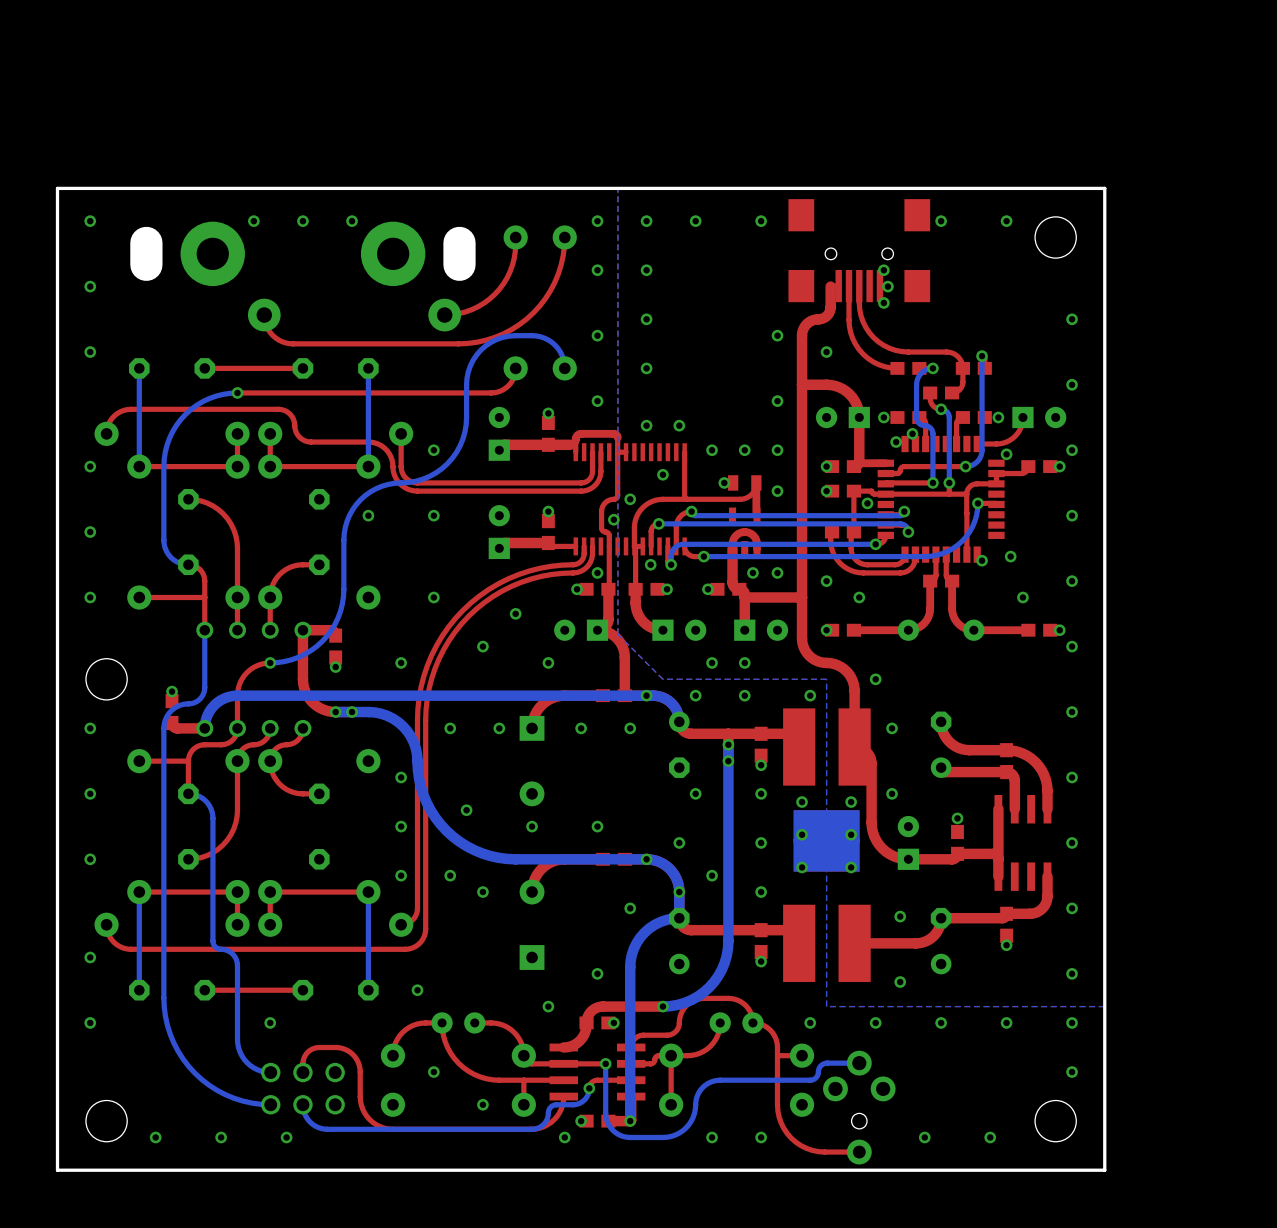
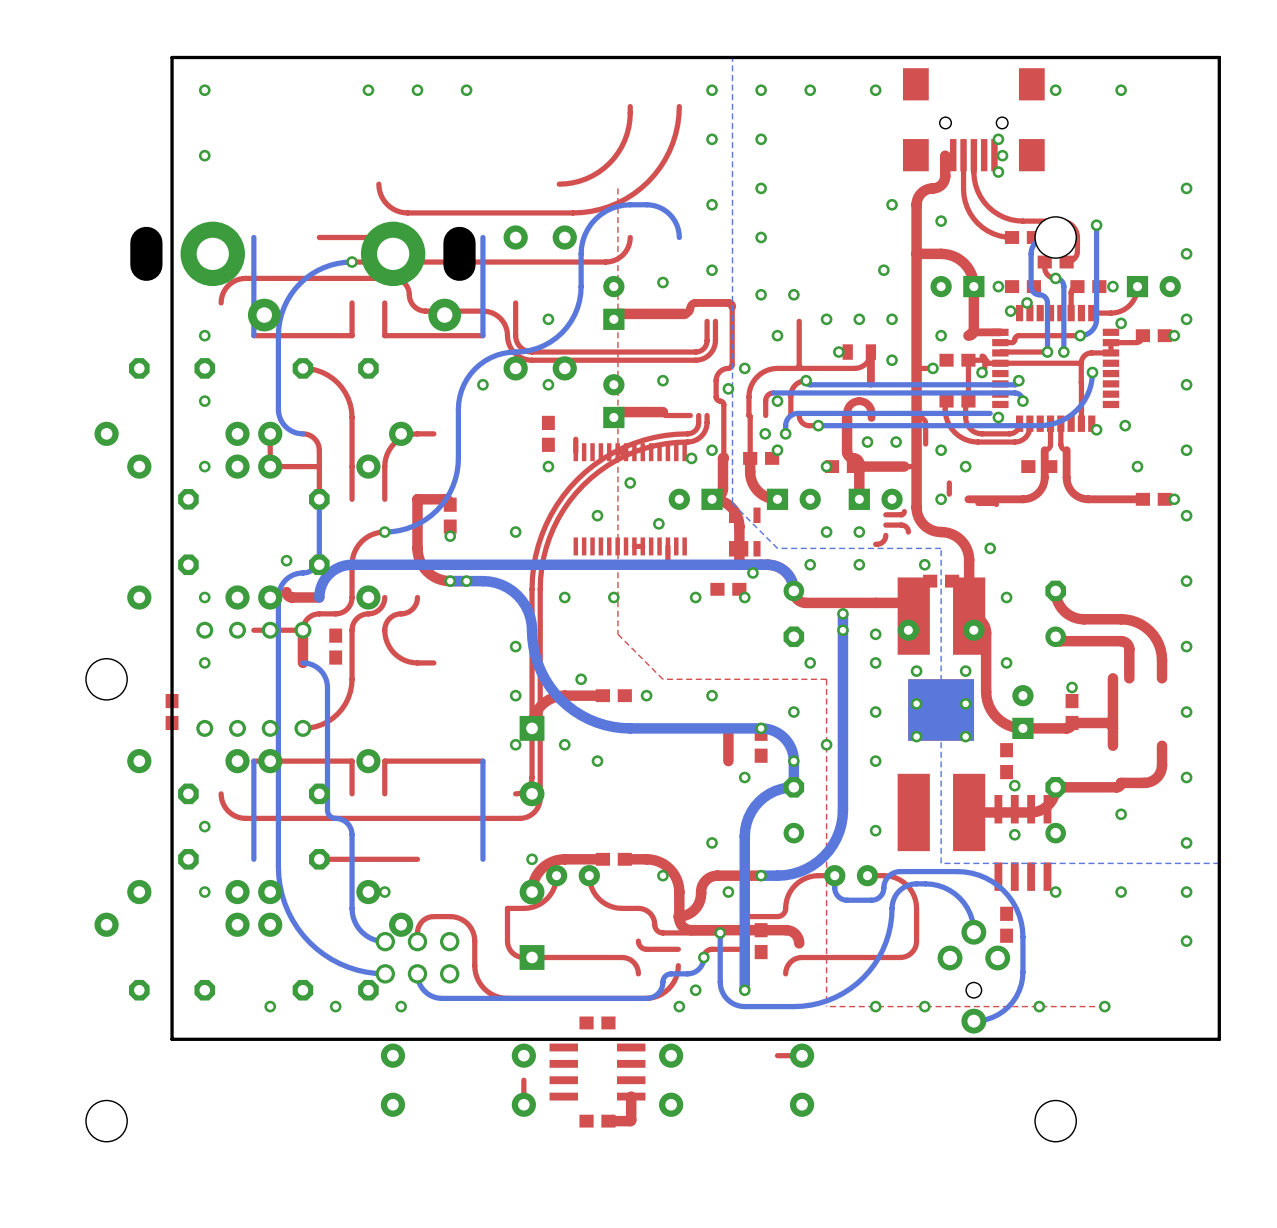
bottom zone outline: none -> (732, 57) (732, 503) (777, 548) (941, 548) (941, 863) (1219, 863)
via: none -> (204, 90)
via: none -> (368, 90)
via: none -> (417, 90)
via: none -> (466, 90)
via: none -> (712, 90)
via: none -> (761, 90)
via: none -> (810, 90)
via: none -> (875, 90)
via: none -> (1055, 90)
via: none -> (1121, 90)
via: none -> (712, 139)
via: none -> (761, 139)
via: none -> (998, 139)
via: none -> (204, 155)
via: none -> (1002, 155)
via: none -> (998, 172)
bottom zone outline: (617, 188) (617, 634) (662, 679) (826, 679) (826, 1006) (1104, 1006) -> none
via: none -> (761, 188)
board edge: (1104, 188) (57, 188) (57, 1170) (1104, 1170) (1104, 188) -> (1219, 57) (172, 57) (172, 1039) (1219, 1039) (1219, 57)
via: none -> (1186, 188)
via: none -> (892, 204)
via: (90, 221) -> none
via: (253, 221) -> none
via: (302, 221) -> none
via: (352, 221) -> none
via: (597, 221) -> none
via: (646, 221) -> none
via position: (695, 221) -> (712, 204)
via: (761, 221) -> none
via: (1006, 221) -> none
via: none -> (1096, 225)
top track: none -> (417, 237) (319, 237)
top track: (515, 237) (514, 257) (510, 271) (494, 294) (471, 309) (444, 315) -> (630, 106) (628, 127) (624, 140) (609, 163) (586, 178) (559, 184)
top track: (564, 237) (563, 255) (558, 273) (545, 298) (533, 312) (519, 324) (503, 333) (485, 340) (458, 343) (289, 343) (272, 335) (266, 326) (264, 315) -> (679, 106) (675, 134) (669, 151) (660, 167) (648, 181) (633, 193) (617, 202) (600, 209) (572, 212) (403, 212) (387, 204) (381, 195) (378, 184)
via: none -> (761, 237)
part: none -> (1022, 237)
part position: (859, 250) -> (973, 119)
via: none -> (1186, 253)
via: none -> (352, 262)
part: none -> (1055, 262)
via: (597, 270) -> none
via: (646, 270) -> none
via: none -> (712, 270)
via: none -> (1055, 278)
via: none -> (662, 282)
via: (90, 286) -> none
top track: (838, 286) (830, 286) (830, 308) (828, 314) (823, 318) (808, 322) (802, 333) (802, 644) (811, 657) (820, 662) (840, 666) (852, 680) (854, 690) (854, 747) (864, 750) (871, 759) (871, 827) (876, 840) (882, 848) (889, 854) (903, 858) (952, 859) (955, 857) (957, 853) (992, 853) (996, 855) (998, 859) -> (953, 155) (945, 155) (945, 177) (942, 183) (937, 187) (922, 191) (916, 202) (917, 513) (926, 526) (934, 531) (955, 535) (967, 549) (969, 560) (969, 616) (979, 619) (985, 628) (986, 696) (988, 705) (996, 717) (1004, 723) (1018, 728) (1066, 728) (1070, 726) (1072, 722) (1107, 722) (1111, 724) (1112, 728)
top track: (849, 286) (849, 326) (855, 344) (863, 354) (873, 361) (884, 366) (897, 368) -> (963, 155) (963, 195) (970, 213) (977, 223) (987, 231) (999, 235) (1011, 237)
top track: (859, 286) (859, 309) (863, 321) (869, 332) (878, 341) (895, 350) (948, 352) (959, 358) (962, 366) (962, 384) (958, 390) (952, 392) -> (973, 155) (974, 178) (977, 190) (984, 201) (993, 210) (1010, 219) (1063, 221) (1074, 227) (1077, 235) (1077, 254) (1073, 259) (1066, 262)
via: (887, 286) -> none
part: none -> (957, 286)
via: none -> (998, 286)
part: none -> (1022, 286)
part: none -> (1088, 286)
via: none -> (1112, 286)
part: none -> (1153, 286)
via: none -> (761, 294)
via: none -> (793, 294)
top track: none -> (384, 302) (384, 335) (482, 335)
part: none -> (613, 302)
via: (883, 302) -> none
via: none -> (1027, 302)
via: none -> (1010, 311)
via: none -> (548, 319)
via: (646, 319) -> none
via: none -> (826, 319)
via: none -> (859, 319)
via: none -> (892, 319)
via: (1072, 319) -> none
via: none -> (1186, 319)
via: none -> (1121, 323)
via: none -> (204, 335)
via: (597, 335) -> none
via: none -> (941, 335)
top track: none -> (1080, 335) (1018, 335) (1012, 342) (1000, 342)
via: none -> (1080, 335)
part: none -> (1153, 335)
via: none -> (1174, 335)
via: (90, 352) -> none
via position: (826, 352) -> (838, 352)
via: none -> (1047, 352)
via: none -> (1063, 352)
bottom track: (982, 356) (981, 452) (975, 463) (965, 466) -> (1096, 225) (1096, 321) (1090, 332) (1080, 335)
via position: (982, 356) -> (982, 372)
via: none -> (892, 360)
part: none -> (957, 360)
bottom track: (139, 368) (139, 466) -> (253, 237) (253, 335)
top track: (302, 368) (204, 368) -> (302, 368) (315, 370) (332, 378) (341, 387) (348, 398) (352, 417) (352, 499)
bottom track: (368, 368) (368, 466) -> (482, 237) (482, 335)
top track: (515, 368) (510, 383) (503, 389) (494, 392) (237, 392) -> (630, 237) (625, 252) (617, 258) (608, 261) (352, 262)
bottom track: (564, 368) (563, 359) (558, 348) (551, 342) (540, 336) (502, 337) (491, 342) (480, 350) (473, 360) (468, 372) (466, 424) (462, 439) (456, 452) (447, 463) (429, 476) (415, 481) (382, 486) (370, 491) (356, 504) (345, 527) (343, 596) (335, 624) (322, 641) (304, 654) (284, 661) (270, 662) -> (679, 237) (676, 224) (672, 217) (666, 211) (655, 205) (617, 206) (605, 211) (595, 219) (587, 229) (582, 241) (580, 293) (577, 308) (571, 321) (556, 337) (544, 345) (530, 350) (496, 355) (479, 364) (470, 373) (459, 396) (458, 465) (449, 493) (441, 505) (425, 519) (406, 528) (384, 532)
via position: (646, 368) -> (662, 380)
via: none -> (744, 368)
part: (908, 368) -> none
bottom track: (932, 368) (921, 373) (916, 384) (916, 419) (920, 424) (929, 427) (932, 432) (932, 482) -> (1047, 237) (1035, 242) (1031, 253) (1031, 288) (1035, 293) (1044, 296) (1047, 301) (1047, 352)
part: (973, 368) -> none
via: none -> (1092, 372)
via: none -> (806, 380)
via: none -> (1018, 380)
via: none -> (482, 384)
via: none -> (548, 384)
top track: (802, 384) (835, 385) (849, 394) (856, 404) (859, 417) (859, 461) (859, 462) (858, 463) (858, 463) (857, 465) (853, 466) (856, 463) (857, 463) (885, 463) -> (916, 253) (949, 254) (964, 263) (971, 274) (973, 286) (973, 330) (973, 331) (973, 332) (973, 332) (971, 334) (968, 335) (971, 332) (971, 332) (1000, 332)
via: (1072, 384) -> none
via: none -> (1186, 384)
via: none -> (728, 388)
bottom track: (237, 392) (209, 398) (190, 409) (176, 425) (167, 445) (163, 466) (164, 543) (167, 552) (173, 559) (188, 564) -> (352, 262) (330, 265) (311, 274) (295, 288) (281, 314) (278, 335) (278, 412) (285, 426) (293, 431) (302, 433)
via: (237, 392) -> none
top track: (930, 392) (932, 405) (941, 409) -> (1044, 262) (1046, 274) (1055, 278)
part: (941, 392) -> none
via: none -> (204, 401)
via: (597, 401) -> none
part: none -> (613, 401)
part: none -> (957, 401)
via: none -> (1022, 401)
bottom track: (941, 409) (946, 411) (949, 416) (949, 482) -> (1055, 278) (1060, 280) (1063, 285) (1063, 352)
via: (941, 409) -> none
via: (548, 413) -> none
part: (842, 417) -> none
via: (883, 417) -> none
part: (908, 417) -> none
top track: (962, 417) (956, 422) (956, 444) -> (1077, 286) (1071, 291) (1071, 313)
part: (973, 417) -> none
top track: (1022, 417) (1019, 430) (1009, 440) (999, 443) (977, 444) -> (1137, 286) (1133, 299) (1124, 309) (1114, 312) (1091, 313)
part: (1039, 417) -> none
via: (646, 425) -> none
via: (679, 425) -> none
via: none -> (818, 425)
via: none -> (1125, 425)
via: none -> (1096, 429)
top track: (106, 433) (111, 418) (118, 412) (127, 409) (280, 409) (291, 415) (296, 433) (304, 440) (368, 442) (380, 445) (391, 457) (393, 472) (398, 481) (405, 487) (417, 491) (586, 490) (595, 485) (599, 478) (600, 452) -> (221, 302) (223, 293) (228, 285) (242, 278) (395, 278) (405, 284) (411, 302) (419, 309) (482, 311) (495, 314) (505, 326) (508, 342) (512, 350) (522, 358) (532, 360) (700, 359) (707, 356) (713, 348) (715, 321)
top track: (237, 433) (237, 466) (139, 466) -> (352, 302) (352, 335) (253, 335)
top track: (401, 433) (401, 470) (407, 479) (415, 482) (582, 482) (588, 480) (592, 474) (592, 452) -> (515, 302) (516, 339) (520, 347) (529, 351) (697, 351) (702, 349) (706, 343) (707, 321)
part: (499, 433) -> none
via: none -> (765, 433)
via: none -> (785, 433)
via: (912, 433) -> none
via: none -> (867, 442)
via: (433, 450) -> none
top track: (499, 450) (504, 444) (571, 444) (580, 433) (616, 434) (617, 496) (615, 498) (605, 502) (601, 511) (601, 529) (609, 535) (608, 620) (604, 627) (597, 630) (611, 633) (622, 647) (624, 657) (624, 695) (656, 695) (666, 699) (675, 708) (680, 727) (688, 733) (787, 733) (795, 737) (799, 747) -> (613, 319) (618, 313) (686, 313) (694, 302) (731, 304) (732, 365) (730, 367) (719, 372) (716, 380) (716, 398) (723, 404) (722, 489) (719, 496) (712, 499) (725, 502) (737, 516) (739, 526) (739, 564) (771, 564) (780, 568) (790, 577) (795, 596) (802, 602) (902, 603) (911, 608) (913, 616)
via: (744, 450) -> none
via: none -> (941, 450)
via: (1072, 450) -> none
via: none -> (1186, 450)
top track: (684, 452) (684, 496) (687, 499) -> (799, 321) (799, 365) (802, 368)
via: (1006, 454) -> none
via: none -> (691, 458)
part: none -> (761, 458)
via: (90, 466) -> none
via: none -> (204, 466)
top track: (368, 466) (319, 466) -> none
via: none -> (548, 466)
top track: (904, 466) (898, 473) (885, 473) -> (904, 466) (859, 466)
top track: (965, 466) (916, 466) -> none
top track: (1028, 466) (1023, 473) (996, 473) (996, 483) (973, 484) (968, 487) (966, 494) -> (1142, 335) (1137, 342) (1110, 342) (1110, 352) (1087, 353) (1083, 356) (1081, 363)
via: (1059, 466) -> none
via: none -> (1137, 466)
via: (662, 474) -> none
via: (724, 482) -> none
part position: (744, 482) -> (859, 352)
top track: (932, 482) (885, 483) -> (1047, 352) (1000, 352)
via: (932, 482) -> none
via: (949, 482) -> none
via: (777, 491) -> none
via: (826, 491) -> none
part: (842, 491) -> none
top track: (966, 494) (874, 494) (871, 491) (853, 491) (853, 532) (851, 534) (851, 548) (854, 558) (865, 564) (896, 564) (902, 561) (905, 554) -> (1081, 363) (989, 363) (986, 360) (968, 360) (968, 401) (965, 403) (965, 417) (969, 427) (979, 433) (1010, 433) (1016, 430) (1019, 423)
top track: (966, 494) (966, 554) -> (1081, 363) (1081, 423)
top track: (188, 499) (201, 500) (212, 505) (227, 518) (233, 529) (237, 548) (237, 630) -> none
via position: (630, 499) -> (630, 482)
part: none -> (695, 499)
part: none -> (793, 499)
part: none -> (875, 499)
part position: (941, 499) -> (1055, 368)
via: none -> (941, 499)
part: none -> (1153, 499)
via: none -> (1174, 499)
via: (867, 503) -> none
bottom track: (977, 503) (974, 520) (966, 536) (953, 548) (936, 555) (703, 556) -> (1092, 372) (1089, 390) (1080, 405) (1067, 417) (1051, 424) (818, 425)
via: (977, 503) -> none
top track: none -> (450, 504) (445, 499) (417, 499) (418, 556) (424, 568) (433, 576) (445, 580) (466, 581)
via: (548, 511) -> none
top track: (691, 511) (683, 513) (677, 521) (676, 546) -> (806, 380) (796, 383) (791, 390) (790, 415)
via: (691, 511) -> none
bottom track: (904, 511) (900, 515) (695, 515) (691, 511) -> (1018, 380) (1014, 384) (810, 384) (806, 380)
via: (904, 511) -> none
via position: (368, 515) -> (384, 532)
via: (433, 515) -> none
part: none -> (450, 515)
top track: (757, 515) (756, 482) (752, 492) (744, 498) (659, 499) (648, 503) (640, 510) (634, 527) (635, 606) (643, 622) (652, 628) (662, 630) -> (871, 384) (870, 352) (867, 362) (858, 367) (773, 368) (763, 372) (754, 379) (748, 396) (750, 475) (753, 485) (760, 493) (777, 499)
via: (1072, 515) -> none
via: none -> (1186, 515)
via position: (613, 519) -> (597, 515)
top track: (658, 523) (651, 528) (651, 546) -> (773, 392) (766, 397) (765, 415)
bottom track: (658, 523) (900, 523) (906, 526) (908, 532) -> (773, 392) (1014, 392) (1020, 395) (1022, 401)
via: (90, 532) -> none
top track: none -> (384, 532) (368, 536) (356, 548) (352, 560) (351, 599) (345, 610) (337, 613) (313, 615) (306, 620) (302, 630) (253, 630)
part: (499, 532) -> none
via: none -> (515, 532)
part: (548, 532) -> none
via: none -> (826, 532)
top track: (831, 532) (830, 544) (835, 556) (843, 566) (854, 571) (904, 572) (913, 565) (915, 554) -> (946, 401) (945, 413) (949, 425) (958, 435) (969, 440) (1018, 441) (1027, 434) (1029, 423)
part: (842, 532) -> none
via: none -> (859, 532)
via: (908, 532) -> none
via: none -> (450, 536)
bottom track: (875, 544) (681, 544) (672, 550) (671, 564) -> (990, 413) (796, 413) (787, 419) (785, 433)
via: (875, 544) -> none
top track: (575, 546) (551, 546) (548, 542) (504, 542) (500, 544) (499, 548) -> (690, 415) (665, 415) (662, 412) (619, 412) (615, 413) (613, 417)
top track: (584, 546) (583, 557) (577, 563) (529, 571) (508, 578) (479, 595) (455, 618) (442, 636) (431, 655) (423, 676) (417, 709) (417, 910) (411, 921) (401, 924) -> (698, 415) (697, 426) (691, 433) (643, 440) (612, 452) (594, 464) (577, 479) (563, 496) (546, 524) (535, 556) (532, 578) (531, 779) (527, 789) (515, 793)
top track: (592, 546) (591, 560) (582, 570) (531, 578) (502, 590) (484, 602) (461, 623) (438, 659) (429, 688) (426, 709) (425, 928) (424, 936) (417, 945) (405, 949) (131, 949) (121, 947) (113, 942) (108, 934) (106, 924) -> (707, 415) (705, 429) (697, 439) (646, 448) (616, 460) (599, 471) (576, 492) (553, 528) (546, 547) (540, 578) (540, 797) (538, 805) (532, 814) (519, 818) (245, 818) (236, 816) (228, 811) (223, 803) (221, 793)
top track: (684, 546) (689, 555) (703, 556) -> (799, 415) (804, 424) (818, 425)
top track: (757, 548) (756, 539) (749, 532) (740, 532) (733, 539) (732, 583) (735, 587) (742, 590) (744, 593) (744, 630) -> (871, 417) (870, 408) (863, 402) (854, 402) (848, 408) (847, 452) (849, 456) (856, 459) (859, 462) (859, 499)
via: none -> (990, 548)
top track: (935, 554) (935, 576) (930, 581) (929, 611) (923, 623) (911, 630) (853, 630) -> (1050, 423) (1050, 445) (1044, 450) (1044, 480) (1038, 492) (1025, 499) (968, 499)
top track: (946, 554) (946, 576) (952, 581) (952, 611) (958, 623) (971, 630) (1028, 630) -> (1060, 423) (1061, 445) (1066, 450) (1066, 480) (1073, 492) (1085, 499) (1142, 499)
via: (703, 556) -> none
via: (1010, 556) -> none
via: none -> (286, 560)
via: (982, 560) -> none
top track: (188, 564) (198, 568) (204, 576) (204, 630) -> (302, 433) (312, 437) (318, 445) (319, 499)
top track: (319, 564) (294, 565) (283, 571) (276, 577) (270, 593) (270, 630) -> (433, 433) (409, 434) (397, 440) (391, 446) (385, 462) (384, 499)
via: (650, 564) -> none
via: (671, 564) -> none
via: none -> (810, 564)
via: none -> (859, 564)
via: none -> (924, 564)
via: (597, 572) -> none
via: (777, 572) -> none
via: none -> (450, 581)
via: none -> (466, 581)
via: (826, 581) -> none
via: (1072, 581) -> none
via: none -> (1186, 581)
via position: (577, 589) -> (564, 597)
part: (597, 589) -> none
part: (646, 589) -> none
via: (667, 589) -> none
via position: (707, 589) -> (695, 597)
via: (90, 597) -> none
top track: (204, 597) (139, 597) -> none
via: none -> (204, 597)
top track: none -> (417, 597) (415, 605) (411, 610) (394, 615) (388, 620) (384, 628) (385, 638) (391, 650) (401, 658) (413, 662) (433, 662)
via: (433, 597) -> none
via: none -> (613, 597)
via: none -> (744, 597)
top track: (802, 597) (744, 597) -> none
via: (859, 597) -> none
via position: (1022, 597) -> (1006, 597)
via: (515, 613) -> none
part: none -> (793, 613)
bottom track: none -> (842, 613) (842, 810) (839, 831) (828, 851) (812, 865) (792, 874) (761, 875)
via: none -> (842, 613)
part: none -> (1055, 613)
part: none -> (941, 616)
bottom track: (204, 630) (203, 693) (196, 701) (173, 708) (167, 716) (164, 725) (163, 997) (165, 1016) (170, 1034) (178, 1051) (188, 1066) (202, 1079) (217, 1090) (234, 1098) (252, 1103) (270, 1104) -> (319, 499) (318, 562) (311, 570) (288, 578) (281, 585) (278, 594) (278, 866) (280, 885) (284, 903) (292, 920) (303, 935) (316, 948) (331, 959) (348, 967) (366, 972) (385, 973)
top track: (302, 630) (330, 630) (335, 635) -> none
part: (581, 630) -> none
part: (679, 630) -> none
part: (761, 630) -> none
via: (826, 630) -> none
part: (842, 630) -> none
via: none -> (842, 630)
part: (1039, 630) -> none
via: (1059, 630) -> none
via: none -> (875, 634)
via: (482, 646) -> none
via: none -> (515, 646)
via: (1072, 646) -> none
via: none -> (1186, 646)
via: none -> (204, 662)
top track: (270, 662) (261, 664) (250, 669) (239, 683) (237, 695) (237, 730) (234, 738) (225, 744) (196, 746) (190, 752) (188, 761) -> none
via: (270, 662) -> none
top track: (302, 662) (304, 687) (312, 702) (327, 710) (352, 712) -> none
via: (401, 662) -> none
via: (548, 662) -> none
via: (712, 662) -> none
via: (744, 662) -> none
via: none -> (810, 662)
via: none -> (875, 662)
via: none -> (1006, 662)
via: (335, 667) -> none
via: none -> (916, 671)
via: none -> (965, 671)
via: none -> (581, 679)
via: (875, 679) -> none
via: none -> (1072, 687)
via: (172, 691) -> none
via: none -> (515, 695)
via: (695, 695) -> none
via: none -> (712, 695)
via: (744, 695) -> none
via: (810, 695) -> none
part: none -> (941, 695)
via: none -> (916, 703)
via: none -> (965, 703)
bottom track: (335, 712) (381, 713) (392, 718) (403, 726) (410, 736) (415, 748) (420, 786) (430, 810) (446, 830) (474, 850) (507, 858) (650, 859) (662, 863) (672, 872) (679, 887) (679, 918) (660, 921) (644, 932) (636, 942) (630, 960) (630, 1121) -> (450, 581) (495, 582) (507, 587) (517, 595) (525, 605) (530, 617) (535, 655) (545, 679) (560, 699) (588, 719) (621, 728) (765, 728) (777, 732) (787, 741) (793, 756) (793, 787) (775, 791) (763, 797) (751, 811) (745, 829) (744, 990)
via: (335, 712) -> none
via: (352, 712) -> none
via: none -> (793, 712)
via: none -> (875, 712)
part: none -> (1022, 712)
part: none -> (1072, 712)
via: (1072, 712) -> none
via: none -> (1186, 712)
bottom track: (679, 721) (677, 711) (671, 703) (663, 697) (653, 695) (237, 695) (224, 698) (214, 705) (207, 715) (204, 728) -> (793, 590) (791, 580) (786, 572) (777, 566) (767, 564) (352, 564) (339, 567) (328, 574) (321, 584) (319, 597)
top track: (941, 721) (946, 739) (958, 748) (969, 750) (1011, 750) (1031, 758) (1039, 766) (1046, 780) (1047, 809) -> (1055, 590) (1059, 605) (1073, 617) (1083, 619) (1126, 619) (1146, 627) (1156, 639) (1160, 649) (1162, 678)
top track: (172, 722) (176, 728) (204, 728) -> (286, 592) (291, 597) (319, 597)
part: none -> (941, 724)
via: (90, 728) -> none
top track: (270, 728) (268, 736) (263, 741) (245, 746) (238, 754) (237, 816) (230, 834) (223, 844) (212, 852) (201, 857) (188, 859) -> none
top track: (302, 728) (300, 736) (296, 741) (280, 746) (273, 751) (270, 758) (271, 769) (276, 781) (286, 789) (298, 793) (319, 793) -> (302, 728) (315, 726) (327, 721) (337, 714) (345, 703) (351, 685) (353, 623) (360, 616) (378, 610) (383, 603) (384, 597)
via: (450, 728) -> none
via: (499, 728) -> none
via: (581, 728) -> none
via: (630, 728) -> none
via: none -> (761, 728)
via: (892, 728) -> none
via: none -> (916, 736)
via: none -> (965, 736)
via: none -> (515, 744)
via: none -> (564, 744)
part: (679, 744) -> none
bottom track: (728, 744) (728, 941) (726, 955) (718, 975) (703, 992) (684, 1002) (662, 1006) -> none
via: (728, 744) -> none
via: none -> (826, 744)
part: (941, 744) -> none
part: (826, 747) -> none
top track: (188, 761) (188, 793) -> none
top track: (188, 761) (139, 761) -> none
via: none -> (597, 761)
via: (728, 761) -> none
via: none -> (793, 761)
via: none -> (875, 761)
via: (761, 765) -> none
top track: (941, 767) (944, 772) (1010, 773) (1014, 779) (1014, 809) -> (1055, 636) (1059, 641) (1125, 642) (1129, 648) (1129, 678)
via: (401, 777) -> none
via: none -> (744, 777)
via: (1072, 777) -> none
via: none -> (1186, 777)
via: none -> (1014, 785)
via: (90, 793) -> none
bottom track: (188, 793) (203, 798) (209, 806) (212, 815) (213, 942) (217, 948) (231, 952) (236, 961) (238, 1047) (244, 1059) (250, 1065) (262, 1071) (270, 1072) -> (302, 662) (312, 664) (320, 670) (327, 684) (327, 811) (331, 817) (345, 821) (351, 830) (353, 917) (356, 925) (365, 934) (376, 940) (385, 941)
via: (695, 793) -> none
via: (761, 793) -> none
via: (892, 793) -> none
via: (802, 802) -> none
via: (851, 802) -> none
top track: (998, 809) (998, 876) -> (1112, 678) (1112, 745)
via: (466, 810) -> none
part: none -> (793, 810)
part: none -> (1055, 810)
part: none -> (941, 812)
via: none -> (1121, 814)
via: (957, 818) -> none
via: none -> (204, 826)
via: (401, 826) -> none
via: (532, 826) -> none
via: (597, 826) -> none
part: (826, 826) -> none
via: none -> (875, 830)
via: (802, 834) -> none
via: (851, 834) -> none
via: none -> (1014, 834)
via: (679, 842) -> none
via: none -> (712, 842)
via: (761, 842) -> none
part: (908, 842) -> none
part: (957, 842) -> none
via: (1072, 842) -> none
via: none -> (1186, 842)
part: (826, 855) -> none
via: (90, 859) -> none
via: none -> (532, 859)
via: (646, 859) -> none
via: (802, 867) -> none
via: (851, 867) -> none
via position: (401, 875) -> (384, 892)
via: (450, 875) -> none
top track: none -> (556, 875) (552, 892) (540, 904) (528, 908) (507, 908) (507, 943) (510, 951) (517, 956) (523, 957) (624, 957) (635, 963) (638, 973)
part: none -> (572, 875)
top track: none -> (589, 875) (593, 892) (602, 901) (613, 907) (646, 910) (652, 916) (655, 927) (659, 932) (720, 932)
via: none -> (662, 875)
via: (712, 875) -> none
top track: none -> (761, 875) (717, 875) (709, 877) (702, 885) (700, 899) (696, 907) (689, 913) (678, 916)
via: none -> (761, 875)
top track: none -> (834, 875) (814, 875) (798, 882) (790, 892) (785, 911) (780, 915) (745, 916)
bottom track: none -> (834, 875) (835, 892) (839, 897) (845, 900) (877, 898) (882, 892) (887, 877) (892, 873) (900, 871) (972, 873) (992, 881) (1003, 890) (1012, 902) (1021, 922) (1022, 972) (1021, 984) (1016, 996) (1003, 1010) (986, 1019) (973, 1021)
part: none -> (851, 875)
top track: none -> (867, 875) (896, 878) (906, 885) (912, 892) (916, 908) (916, 943) (913, 951) (906, 956) (900, 957) (799, 957) (789, 963) (785, 973)
top track: (1047, 876) (1046, 900) (1043, 906) (1036, 912) (1006, 913) (1002, 918) (941, 918) (939, 927) (933, 936) (919, 943) (854, 943) -> (1162, 745) (1161, 769) (1158, 775) (1151, 781) (1121, 782) (1116, 787) (1055, 787) (1053, 796) (1048, 805) (1033, 812) (969, 812)
top track: (139, 892) (237, 892) (237, 924) -> (253, 761) (352, 761) (352, 793)
bottom track: (139, 892) (139, 990) -> (253, 761) (253, 859)
via: none -> (204, 892)
top track: (368, 892) (270, 892) (270, 924) -> (482, 761) (384, 761) (384, 793)
bottom track: (368, 892) (368, 990) -> (482, 761) (482, 859)
via: (482, 892) -> none
via: (679, 892) -> none
via: none -> (728, 892)
via: (761, 892) -> none
via: none -> (1121, 892)
via: none -> (1186, 892)
via: (630, 908) -> none
via position: (1072, 908) -> (1055, 892)
via: (900, 916) -> none
via: none -> (720, 932)
bottom track: none -> (973, 932) (970, 913) (963, 902) (954, 893) (943, 887) (931, 884) (907, 885) (899, 891) (893, 899) (886, 941) (874, 964) (863, 977) (835, 997) (819, 1003) (793, 1006) (741, 1006) (727, 999) (720, 985) (720, 932)
top track: none -> (638, 941) (640, 946) (644, 949) (678, 949)
part: (679, 941) -> none
part: (941, 941) -> none
via: none -> (1186, 941)
part: (826, 943) -> none
via: (1006, 945) -> none
via: (90, 957) -> none
via: none -> (703, 957)
via: (761, 961) -> none
via: (597, 973) -> none
via: (1072, 973) -> none
via: (900, 982) -> none
top track: (302, 990) (204, 990) -> (417, 859) (319, 859)
via position: (417, 990) -> (401, 1006)
via: none -> (695, 990)
via: none -> (744, 990)
via: none -> (335, 1006)
via: (548, 1006) -> none
top track: (662, 1006) (596, 1007) (587, 1016) (585, 1030) (581, 1038) (572, 1045) (563, 1047) -> none
via position: (662, 1006) -> (679, 1006)
via: none -> (924, 1006)
via: none -> (1039, 1006)
via: none -> (1104, 1006)
via: (90, 1022) -> none
via position: (270, 1022) -> (270, 1006)
part: (458, 1022) -> none
top track: (474, 1022) (495, 1023) (511, 1029) (519, 1039) (524, 1058) (529, 1063) (605, 1063) -> none
via: (613, 1022) -> none
top track: (720, 1022) (719, 1031) (713, 1042) (700, 1053) (687, 1055) (658, 1055) (651, 1063) (631, 1063) -> none
part: (736, 1022) -> none
via: (810, 1022) -> none
via position: (875, 1022) -> (875, 1006)
via: (941, 1022) -> none
via: (1006, 1022) -> none
via: (1072, 1022) -> none
top track: (631, 1047) (633, 1040) (638, 1036) (668, 1035) (674, 1032) (678, 1027) (682, 1010) (694, 1000) (703, 998) (737, 1000) (749, 1010) (752, 1022) (765, 1026) (775, 1038) (777, 1047) (777, 1110) (781, 1122) (787, 1133) (795, 1142) (812, 1150) (859, 1152) -> none
top track: (392, 1055) (397, 1039) (409, 1027) (421, 1023) (442, 1022) (443, 1035) (450, 1053) (458, 1063) (474, 1074) (492, 1079) (563, 1080) -> none
top track: (671, 1055) (671, 1104) -> none
via: (605, 1063) -> none
bottom track: (859, 1063) (823, 1063) (819, 1067) (816, 1077) (811, 1080) (720, 1080) (710, 1082) (698, 1092) (694, 1113) (688, 1124) (675, 1135) (662, 1137) (627, 1137) (617, 1134) (610, 1127) (605, 1116) (605, 1063) -> none
top track: (302, 1072) (304, 1057) (313, 1048) (335, 1047) (347, 1050) (355, 1057) (359, 1065) (360, 1100) (364, 1112) (373, 1122) (388, 1129) (535, 1129) (543, 1126) (554, 1119) (561, 1109) (563, 1096) -> (417, 941) (418, 926) (427, 917) (450, 916) (462, 919) (469, 926) (473, 934) (475, 969) (479, 982) (491, 994) (503, 998) (649, 998) (661, 994) (668, 988) (675, 978) (678, 965)
via: (433, 1072) -> none
via: (1072, 1072) -> none
top track: (631, 1080) (596, 1080) (591, 1083) (589, 1088) -> (745, 949) (710, 949) (705, 952) (703, 957)
part position: (302, 1088) -> (417, 957)
bottom track: (589, 1088) (587, 1096) (579, 1103) (551, 1106) (545, 1122) (540, 1127) (532, 1129) (324, 1129) (315, 1126) (308, 1119) (302, 1104) -> (703, 957) (700, 967) (693, 972) (666, 975) (659, 991) (654, 996) (646, 998) (438, 998) (424, 991) (419, 983) (417, 973)
via: (589, 1088) -> none
via: (482, 1104) -> none
part position: (859, 1107) -> (973, 976)
via: (581, 1121) -> none
via: (630, 1121) -> none
via: (155, 1137) -> none
via: (221, 1137) -> none
via: (286, 1137) -> none
via: (564, 1137) -> none
via: (712, 1137) -> none
via: (761, 1137) -> none
via: (924, 1137) -> none
via: (990, 1137) -> none

